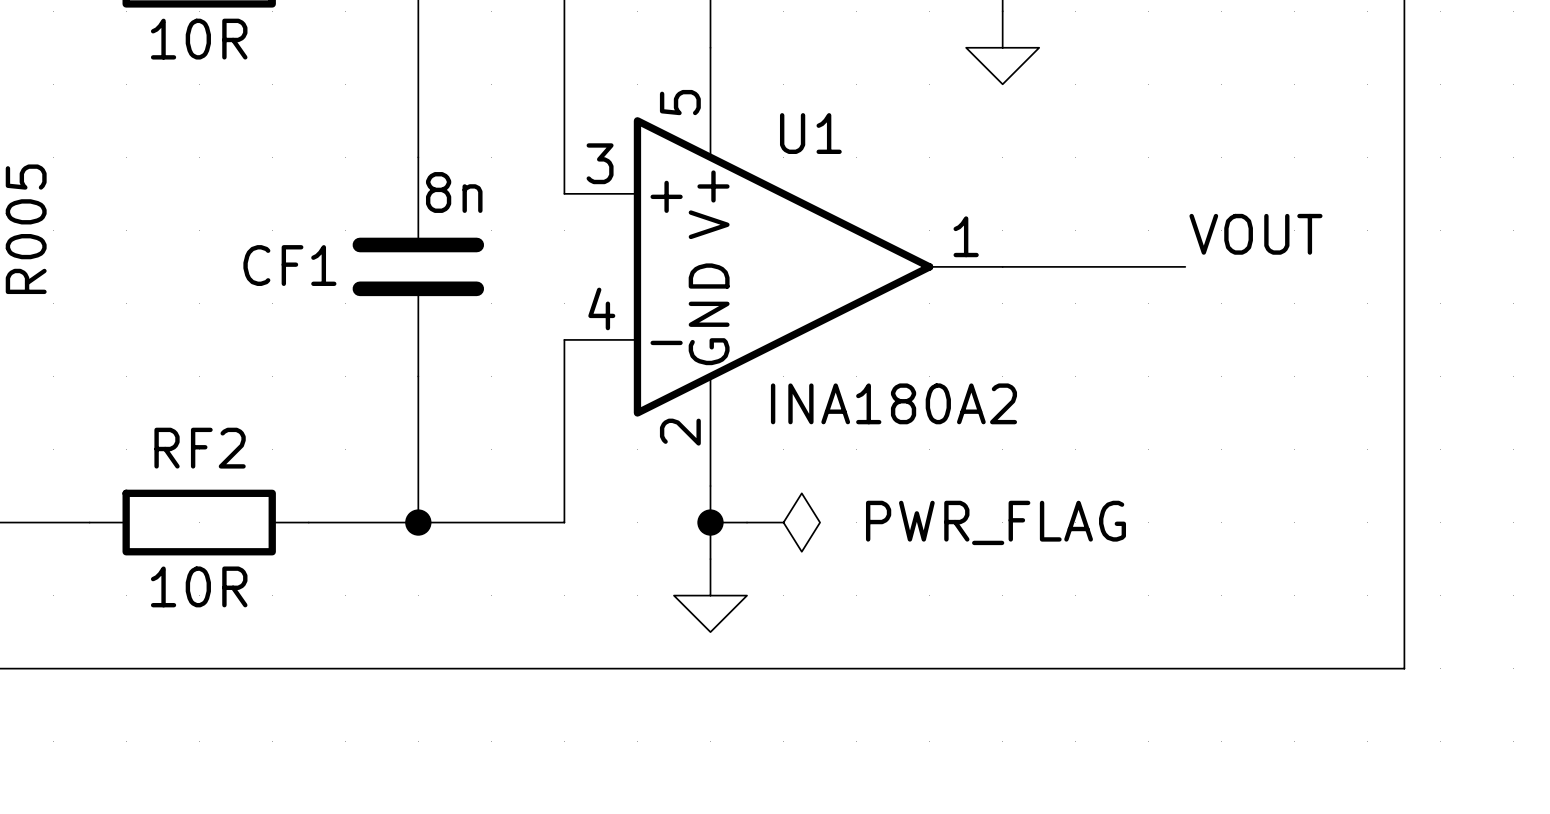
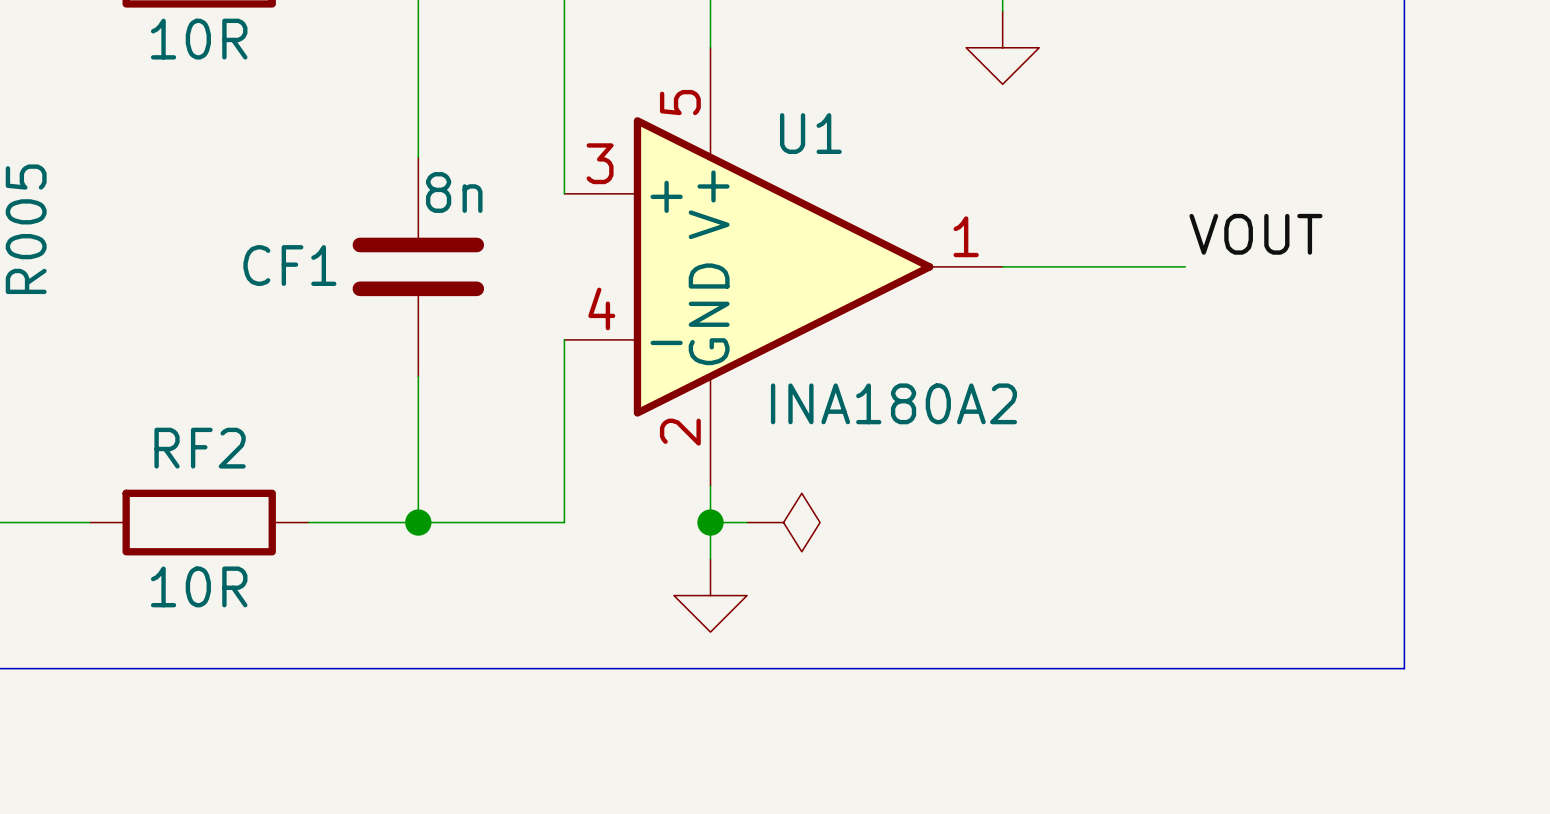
power symbol text: PWR_FLAG (995, 522) -> none

